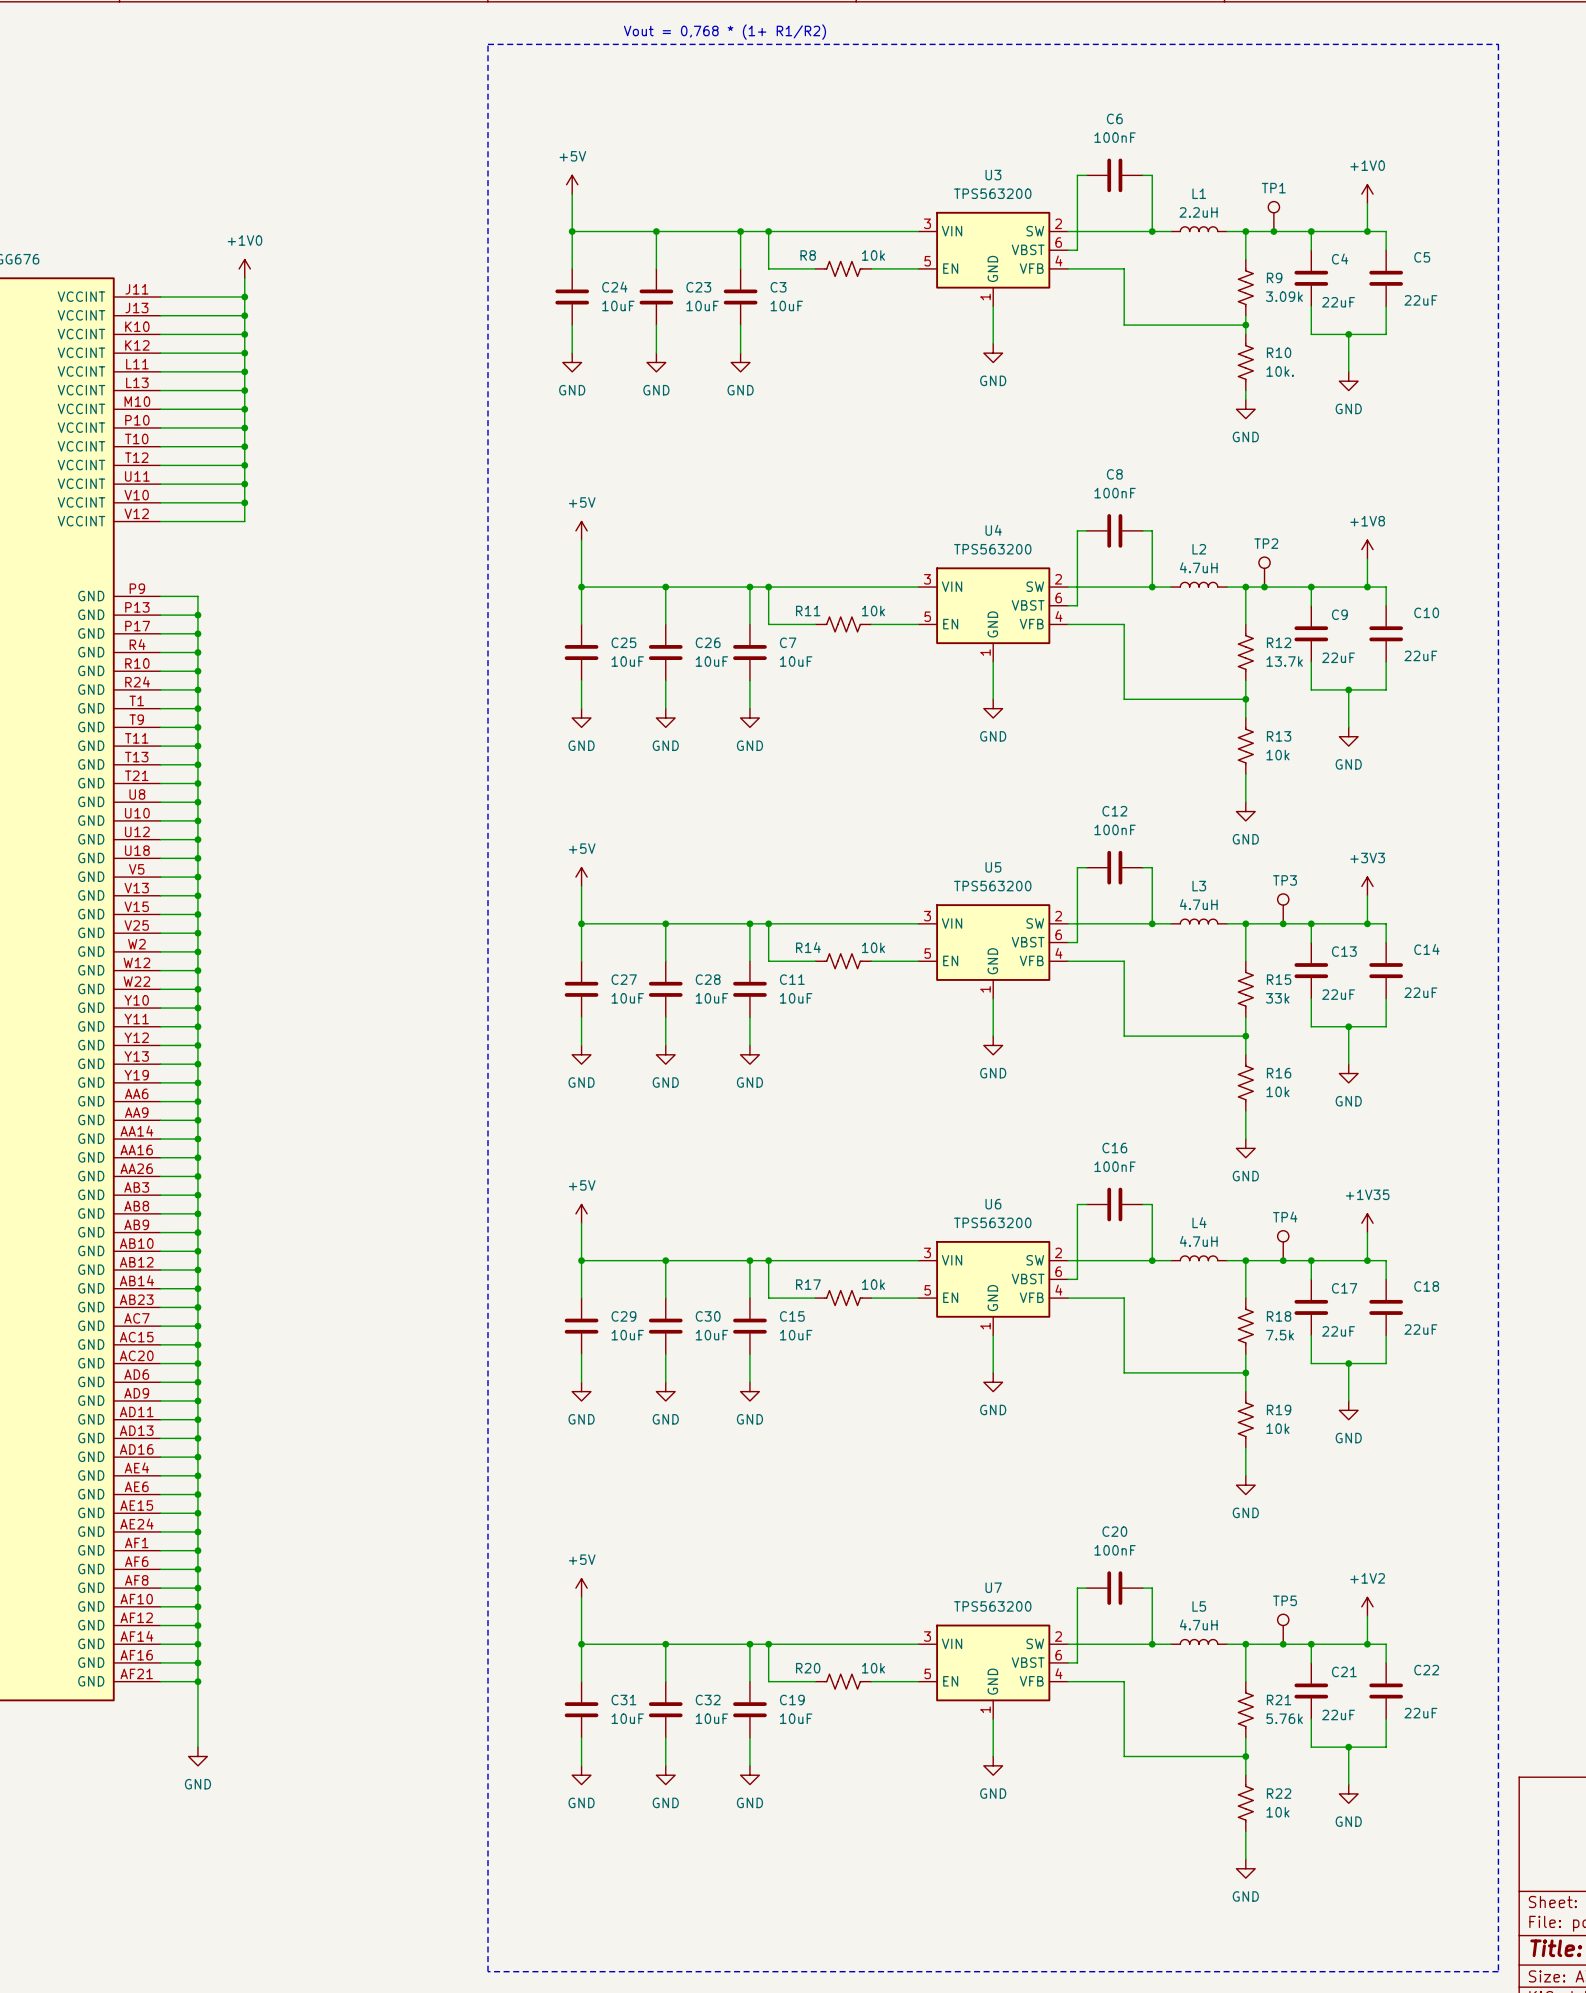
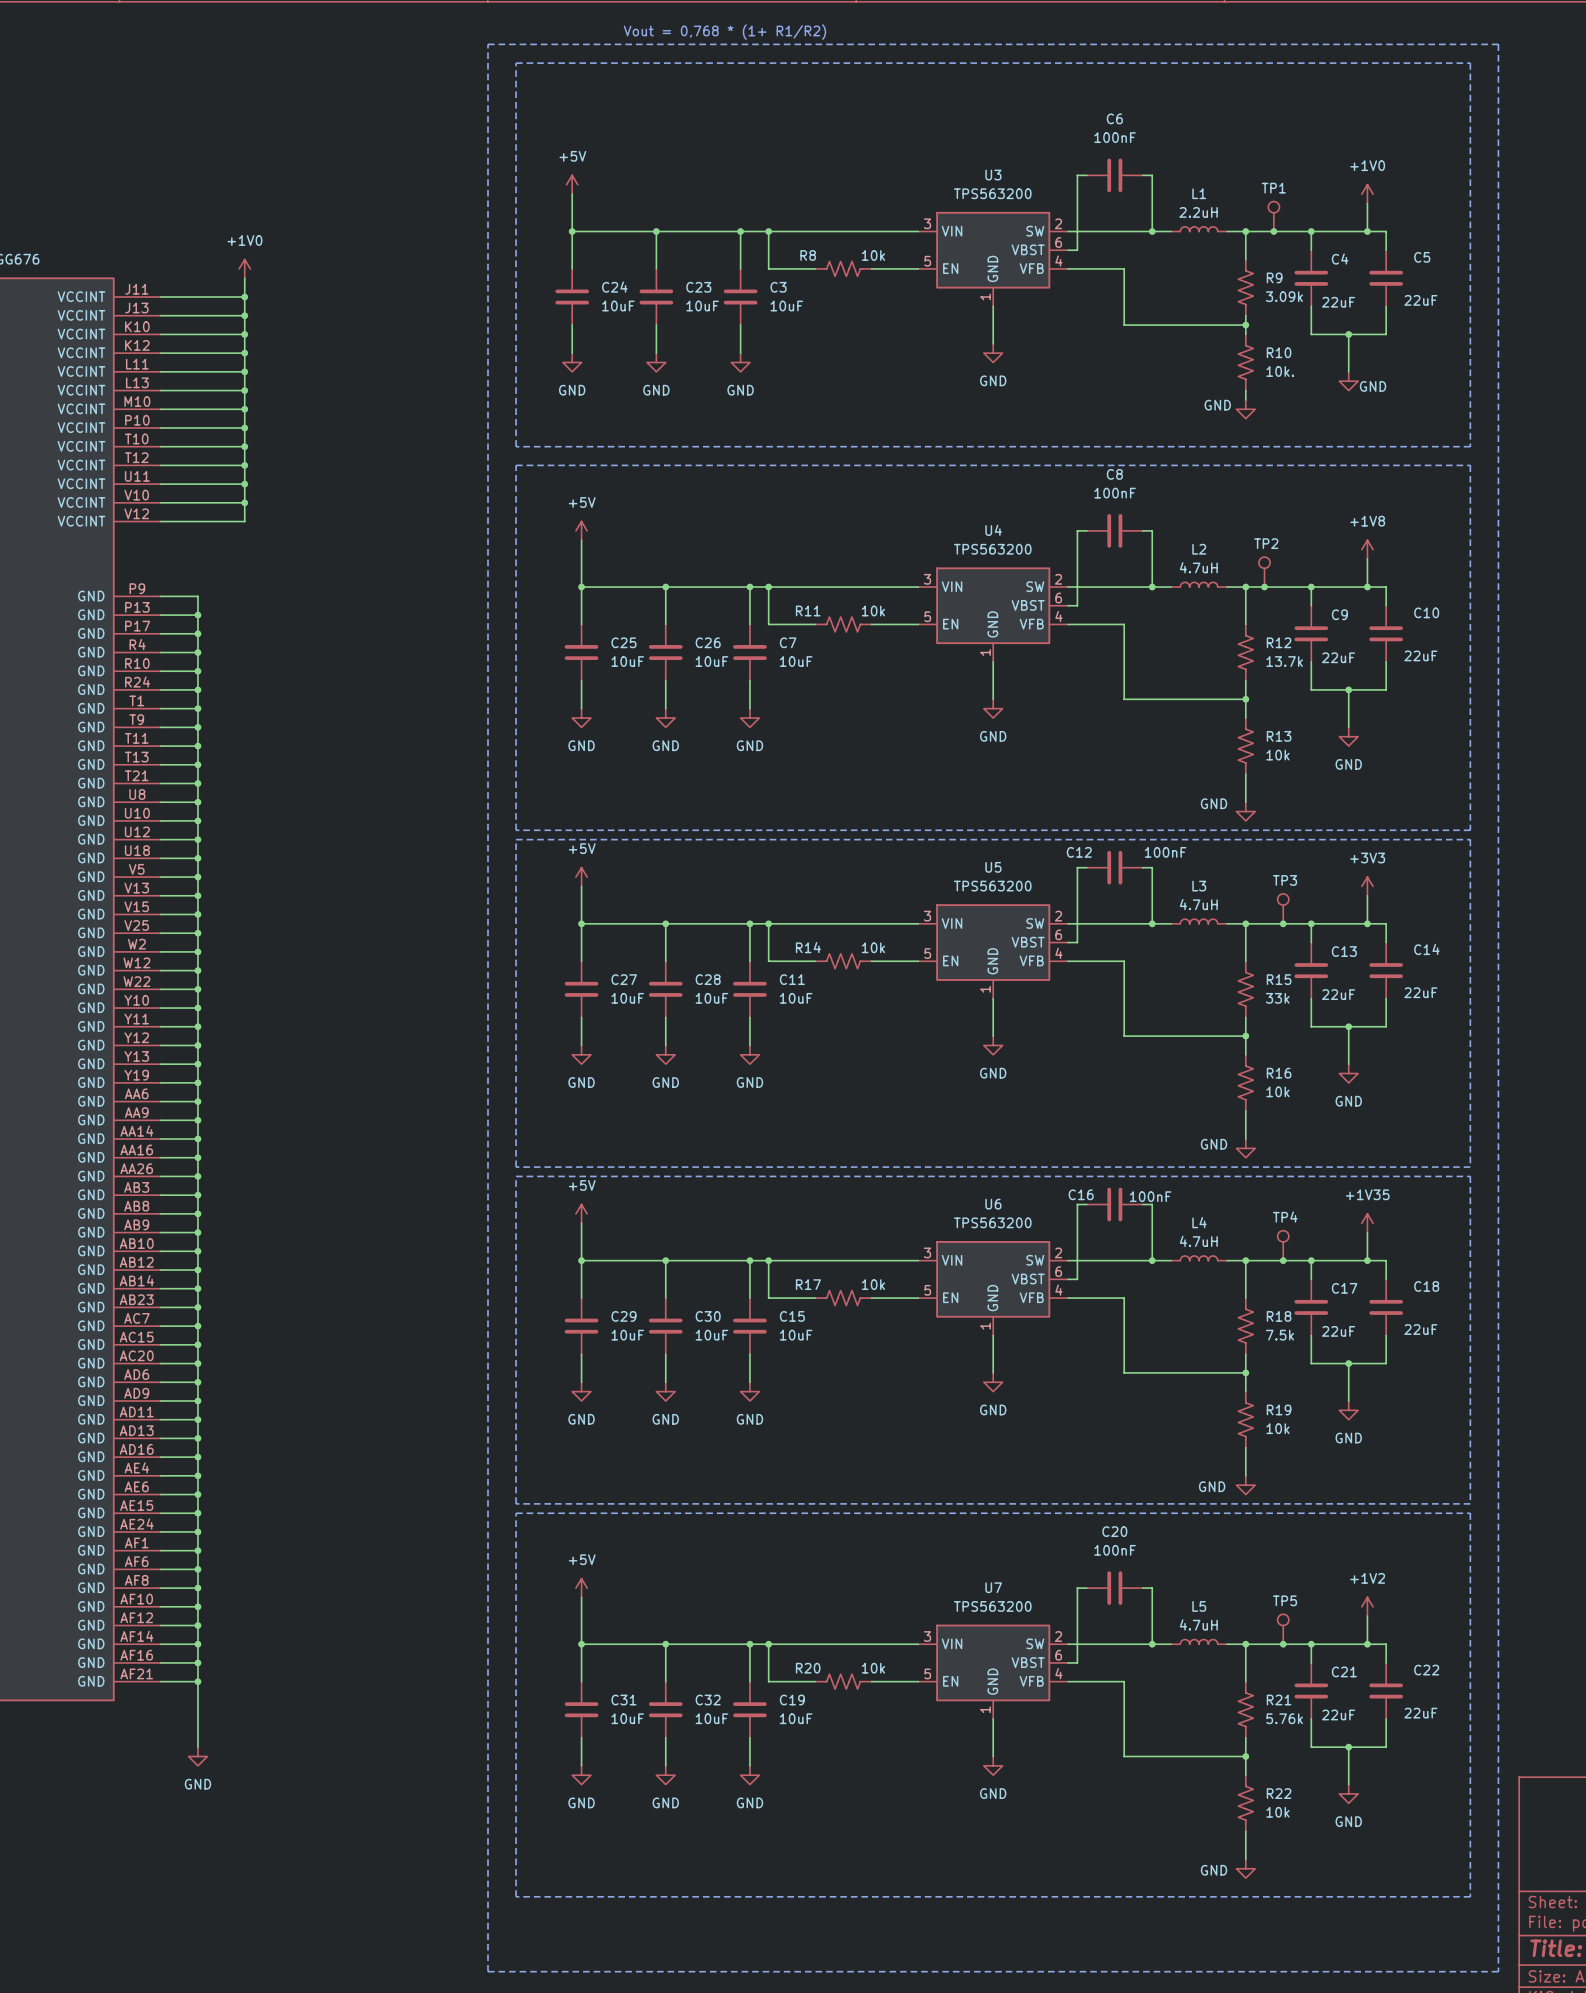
line: none -> (516, 63) (516, 446) (1470, 446) (1470, 63) (516, 63)
power symbol text position: GND (1348, 408) -> GND (1373, 386)
power symbol text position: GND (1245, 436) -> GND (1217, 405)
line: none -> (516, 465) (516, 830) (1470, 830) (1470, 465) (516, 465)
C12 name position: C12 (1114, 811) -> C12 (1079, 852)
C12 value position: 100nF (1115, 829) -> 100nF (1165, 852)
line: none -> (516, 839) (1470, 839) (1470, 1167) (516, 1167) (516, 839)
power symbol text position: GND (1245, 839) -> GND (1214, 803)
C16 name position: C16 (1114, 1148) -> C16 (1081, 1194)
C16 value position: 100nF (1115, 1166) -> 100nF (1150, 1196)
line: none -> (516, 1176) (516, 1503) (1470, 1503) (1470, 1176) (516, 1176)
power symbol text position: GND (1245, 1176) -> GND (1214, 1144)
power symbol text position: GND (1245, 1512) -> GND (1212, 1486)
line: none -> (516, 1513) (516, 1896) (1470, 1896) (1470, 1513) (516, 1513)
power symbol text position: GND (1245, 1896) -> GND (1214, 1870)

